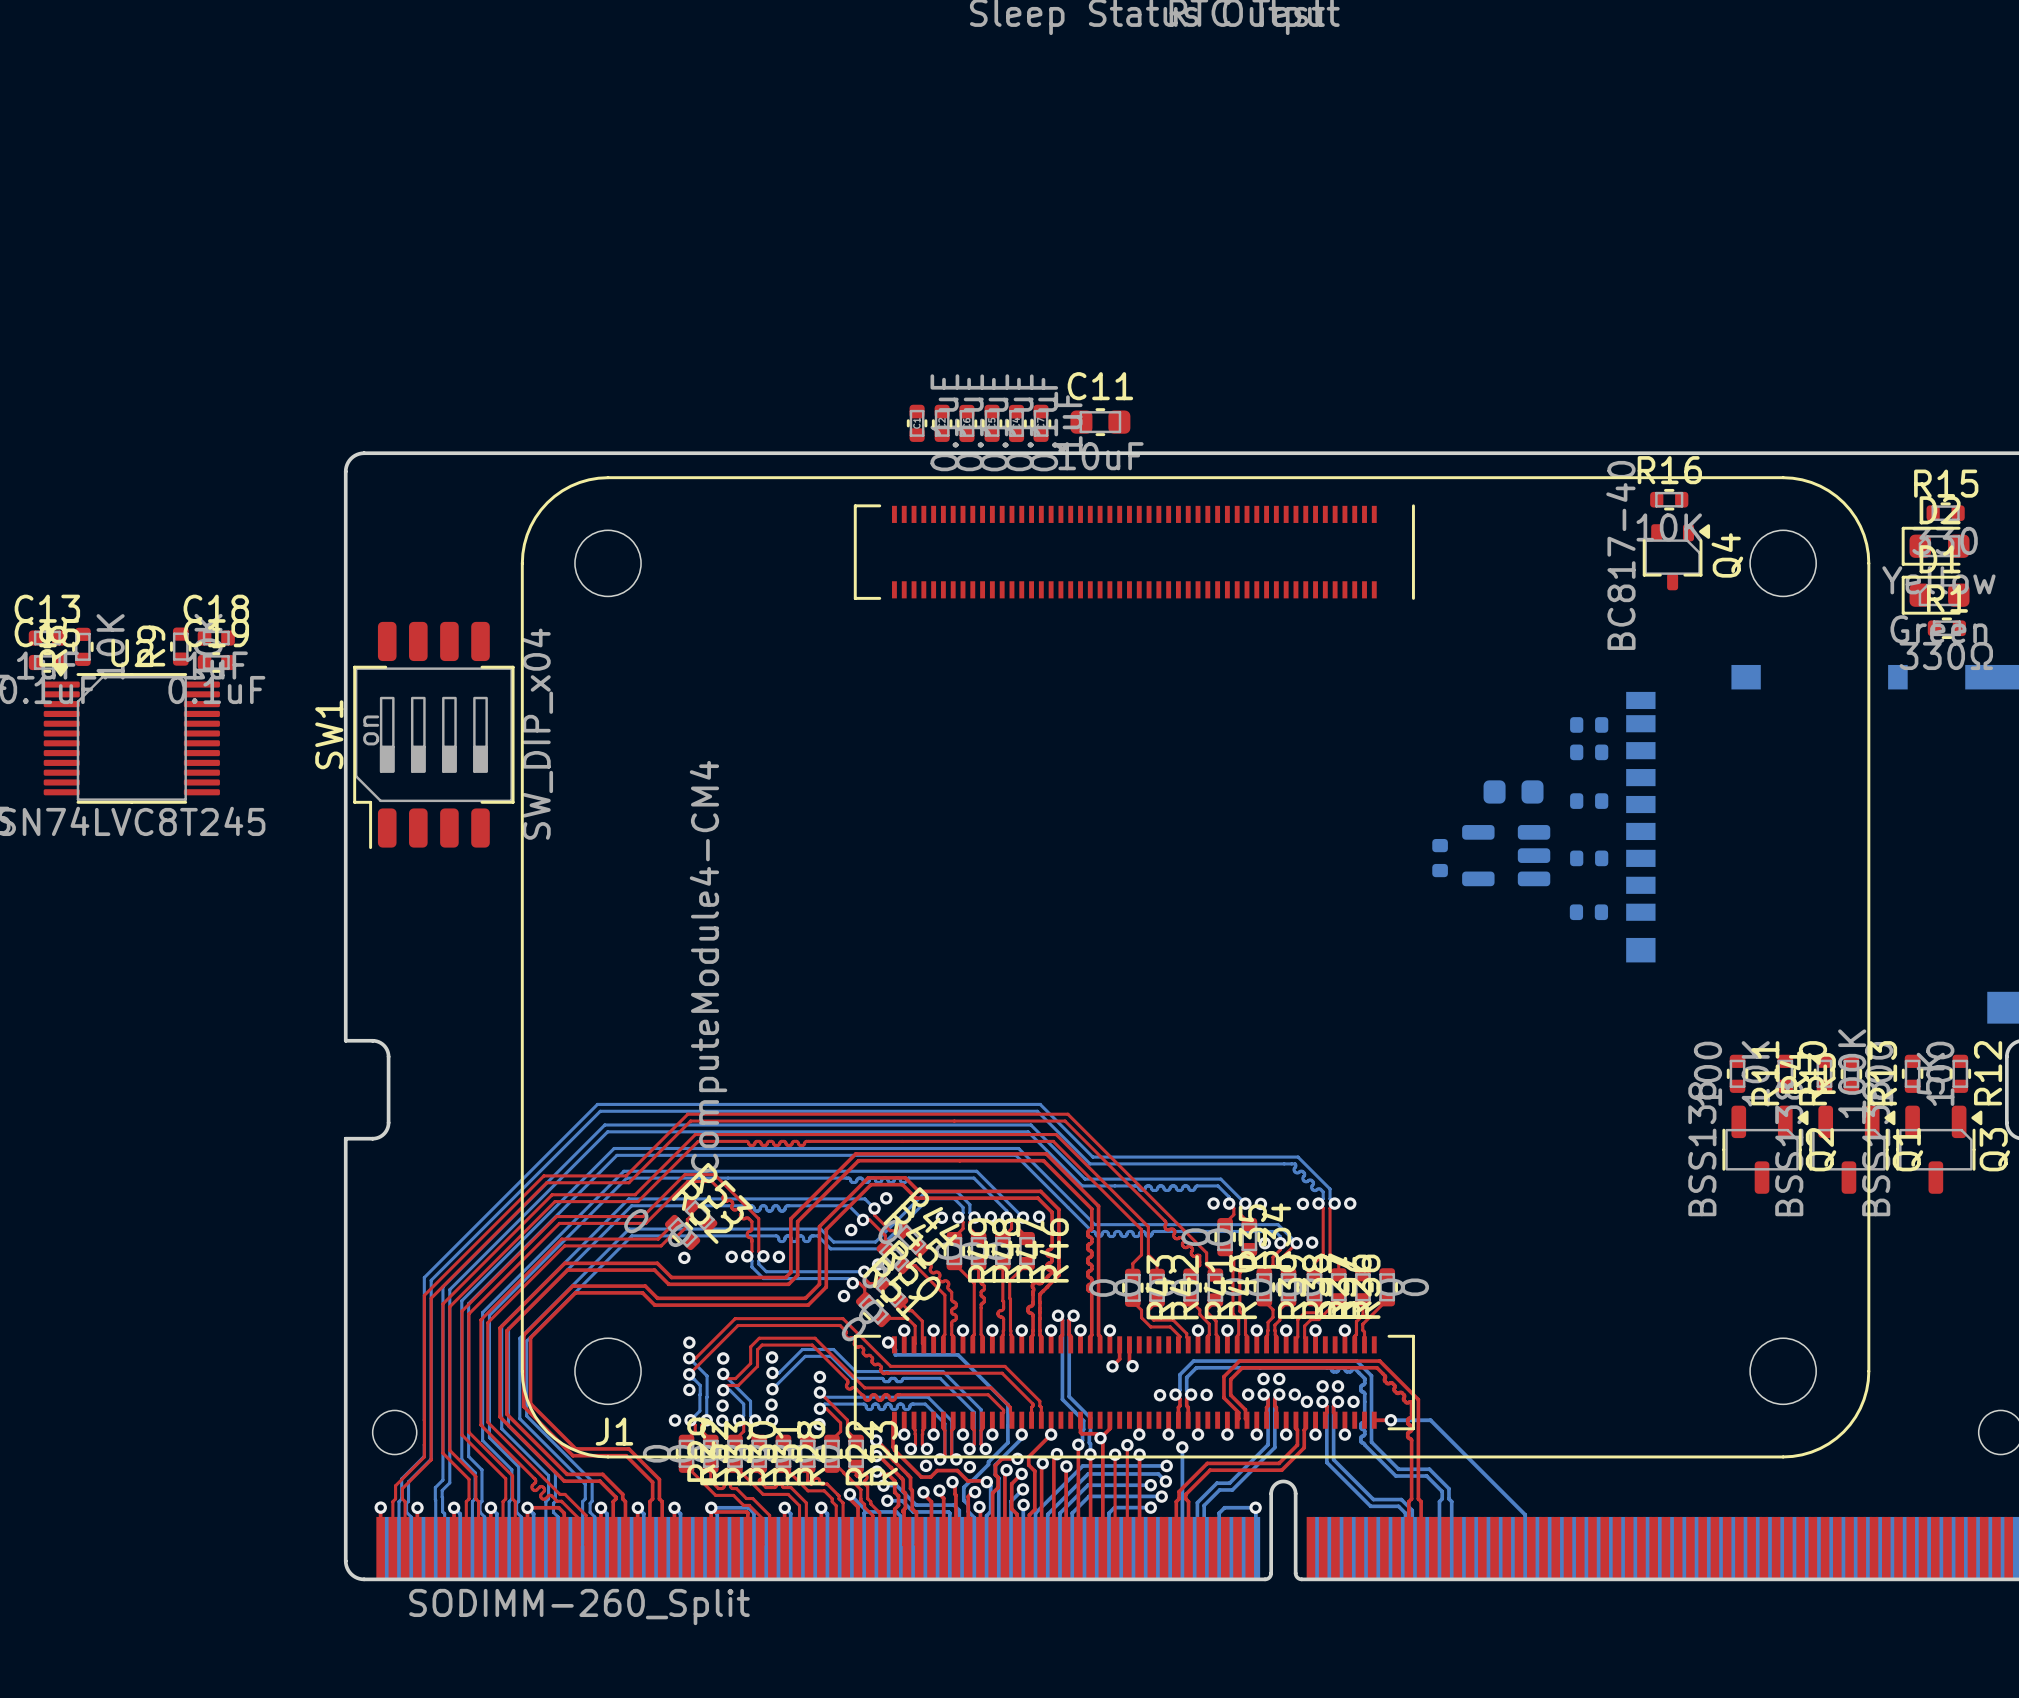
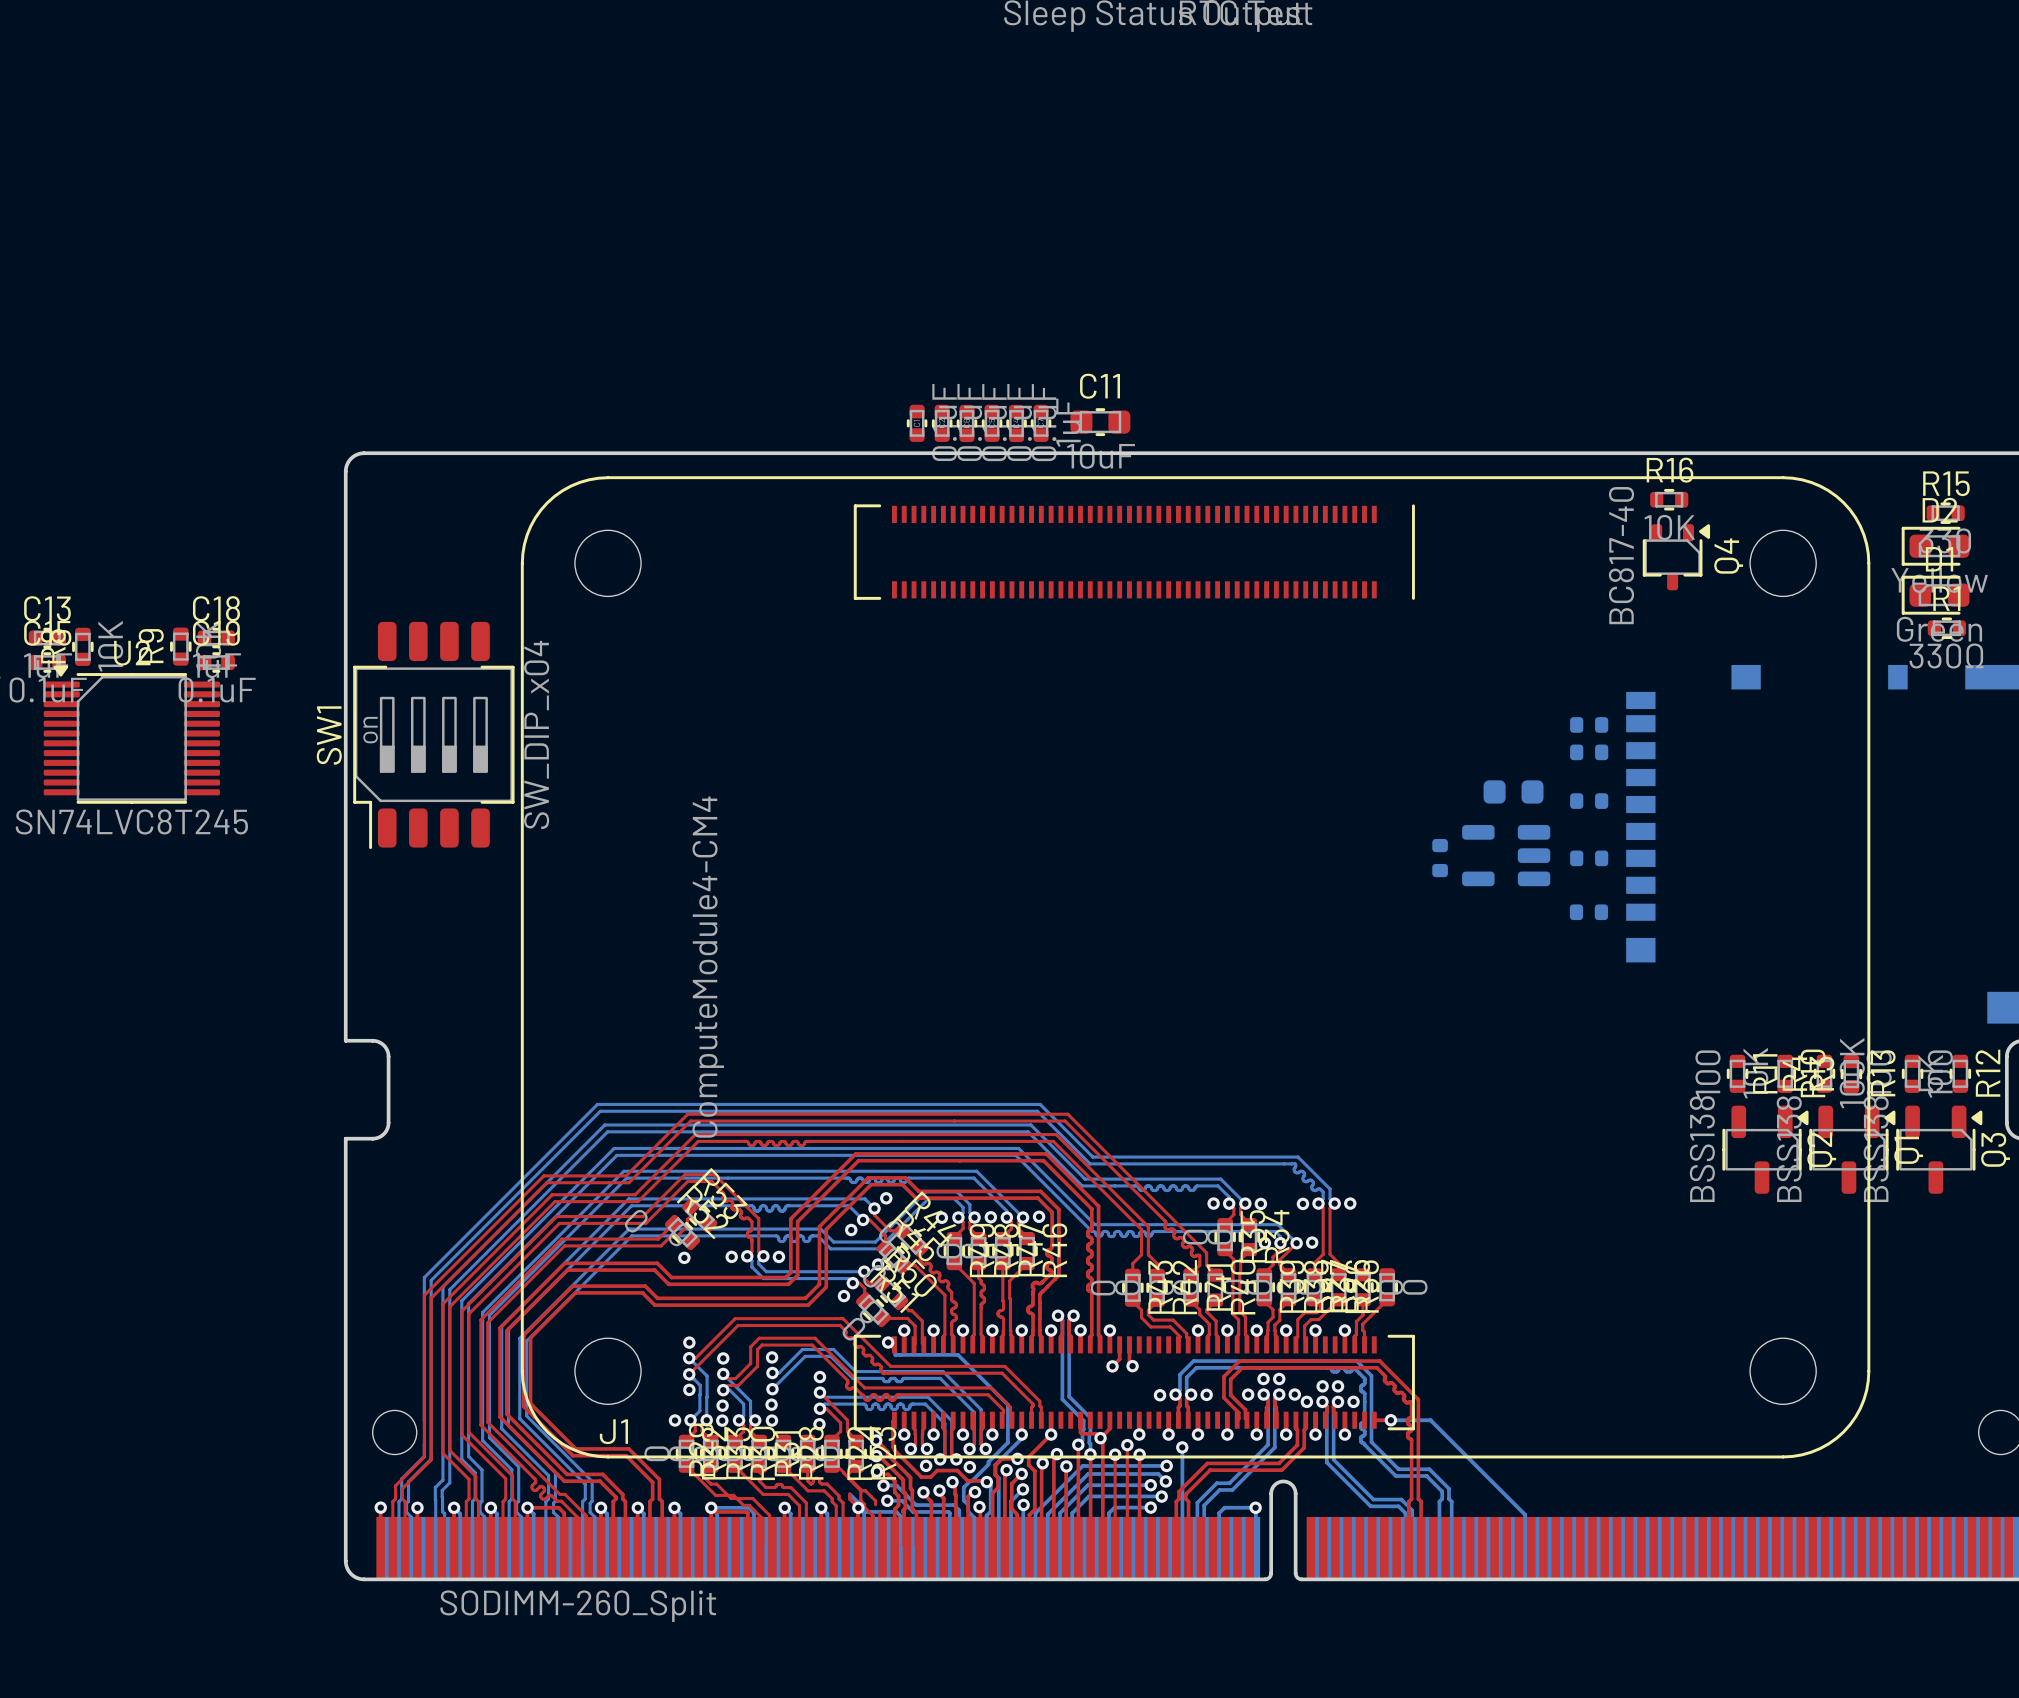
top track: (710, 1466) (710, 1480) (718, 1488) (722, 1488) (724, 1486) -> (710, 1466) (702, 1474) (711, 1484) (716, 1484) (731, 1498) (746, 1498)
top track: (856, 1466) (857, 1476) (863, 1473) (866, 1476) (864, 1482) (867, 1486) (867, 1498) (879, 1512) -> (856, 1466) (848, 1473) (848, 1478) (860, 1490) (865, 1490) (875, 1500) (875, 1504)
top track: (730, 1486) (732, 1488) (736, 1488) (746, 1498) -> none
via position: (849, 1494) -> (858, 1507)

